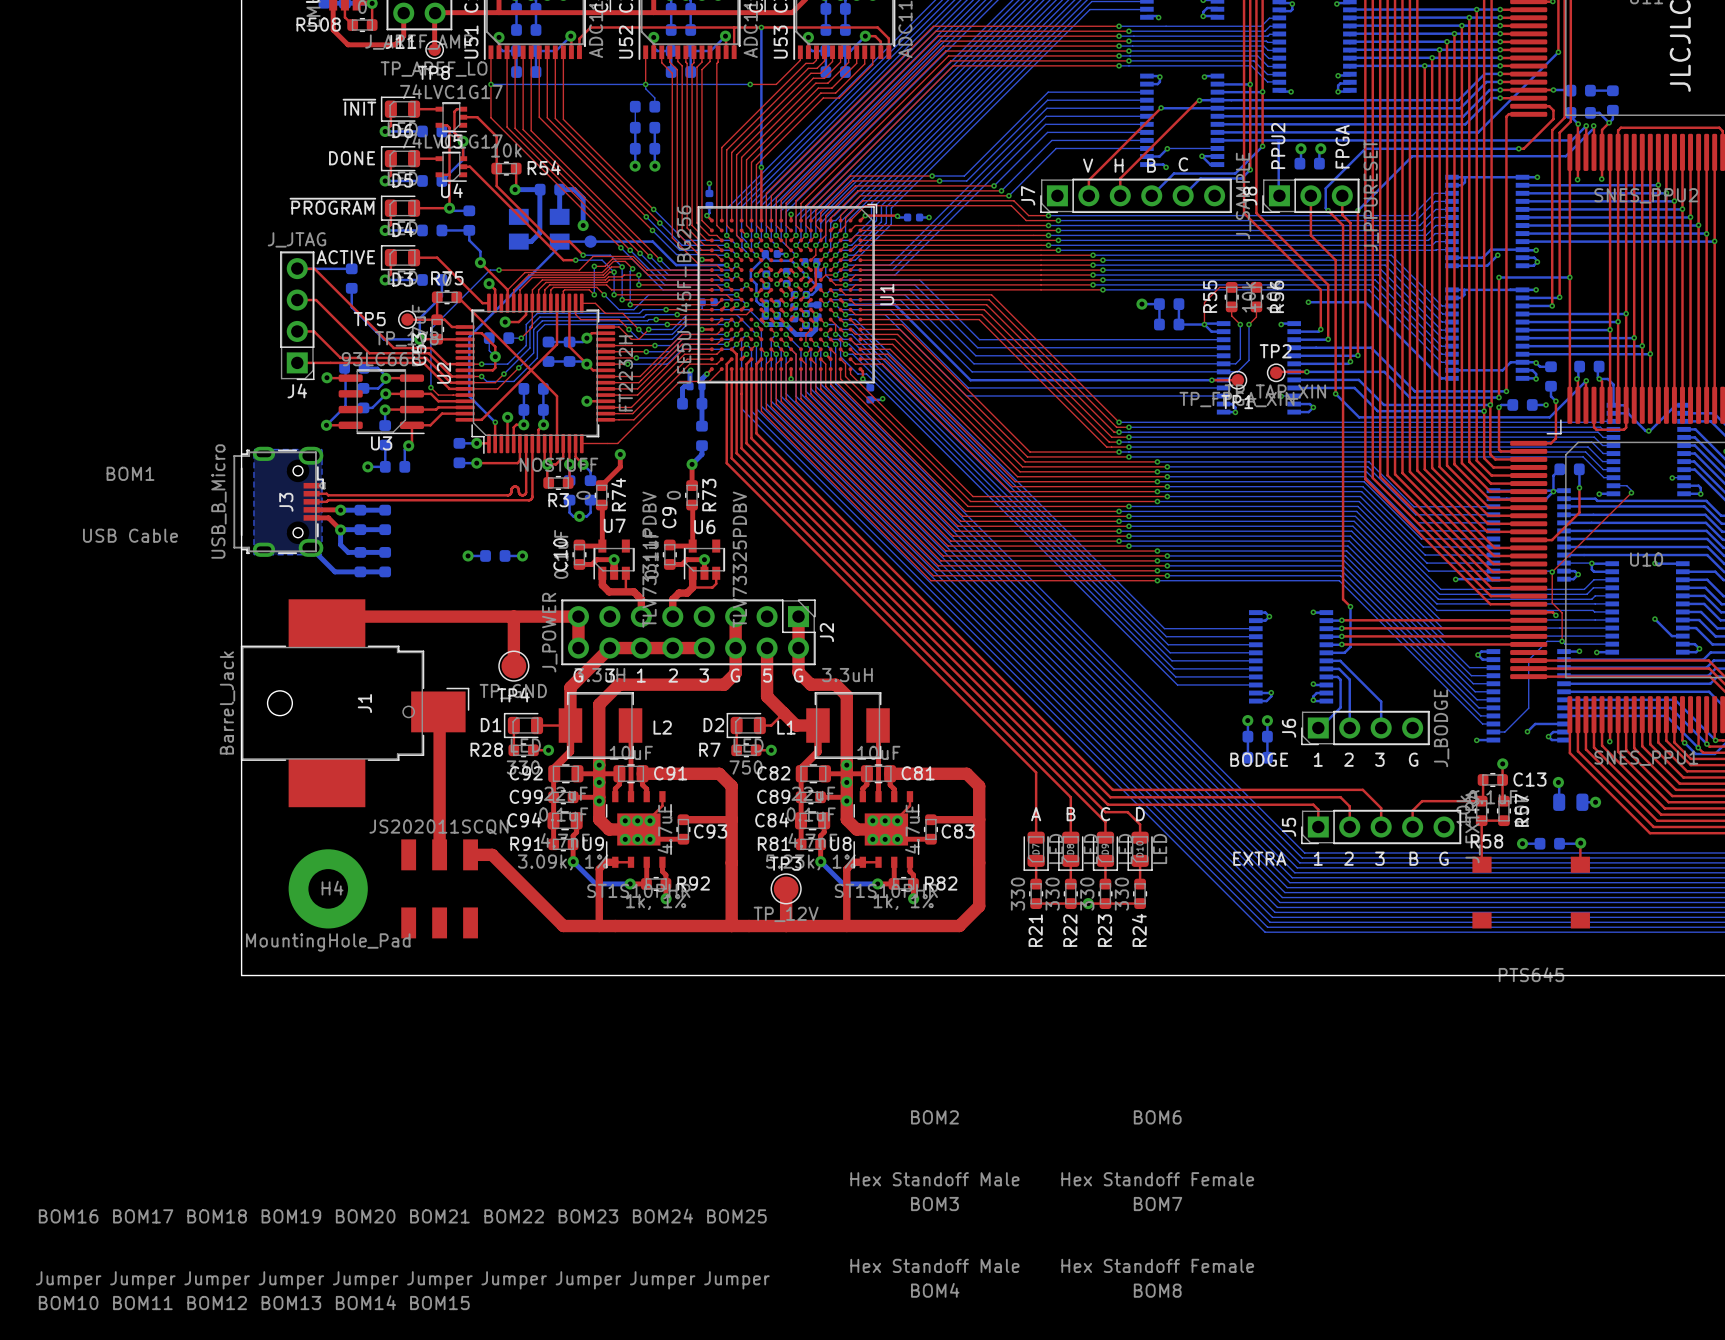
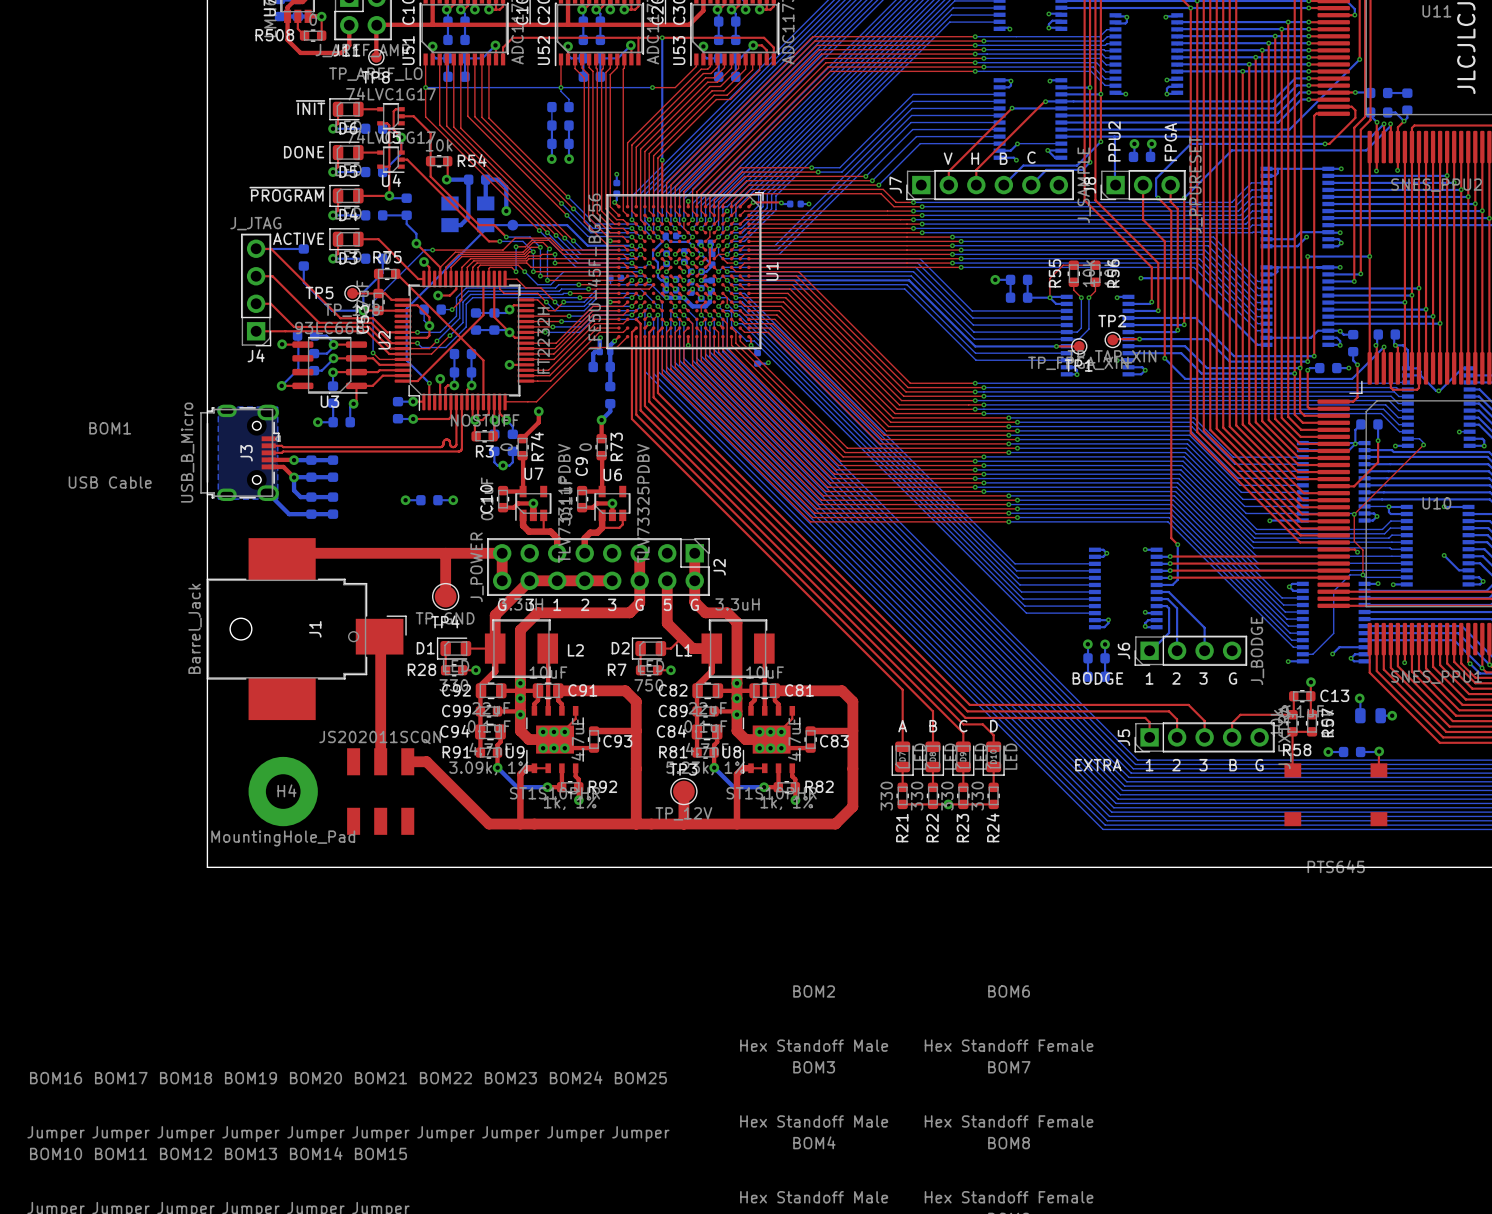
bottom track: (919, 279) (979, 339) (1115, 339) -> (800, 258) (920, 258) (972, 310)
bottom track: (914, 284) (977, 347) (1116, 347) -> (796, 263) (917, 263) (972, 318)
bottom track: (909, 289) (975, 355) (1116, 355) -> (792, 267) (915, 267) (973, 325)
bottom track: (904, 294) (973, 363) (1117, 363) -> (787, 271) (913, 271) (973, 332)
top track: (917, 294) (991, 294) (1119, 422) -> (798, 271) (910, 383) (975, 383)
bottom track: (900, 299) (972, 371) (1118, 371) -> (783, 276) (911, 276) (974, 339)
top track: (914, 299) (989, 299) (1116, 427) -> (796, 276) (908, 387) (973, 387)
bottom track: (895, 304) (970, 380) (1119, 380) -> (779, 280) (909, 280) (975, 346)
top track: (912, 304) (986, 304) (1114, 432) -> (794, 280) (905, 391) (970, 391)
bottom track: (890, 309) (968, 387) (1119, 387) -> (774, 284) (907, 284) (975, 353)
top track: (909, 309) (984, 309) (1111, 437) -> (792, 284) (903, 396) (968, 396)
bottom track: (885, 314) (966, 396) (1119, 396) -> (770, 289) (904, 289) (976, 360)
top track: (907, 314) (981, 314) (1109, 442) -> (790, 289) (901, 400) (966, 400)
top track: (904, 319) (979, 319) (1106, 447) -> (787, 293) (899, 404) (964, 404)

